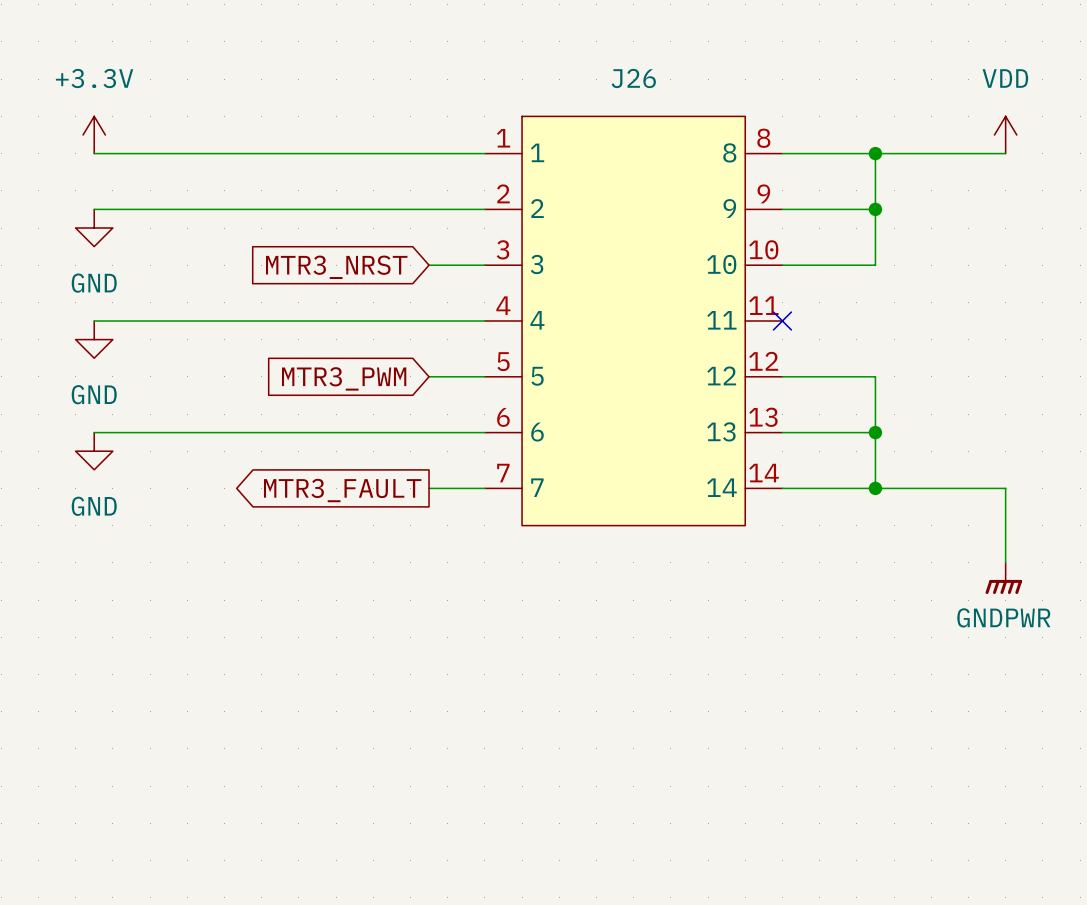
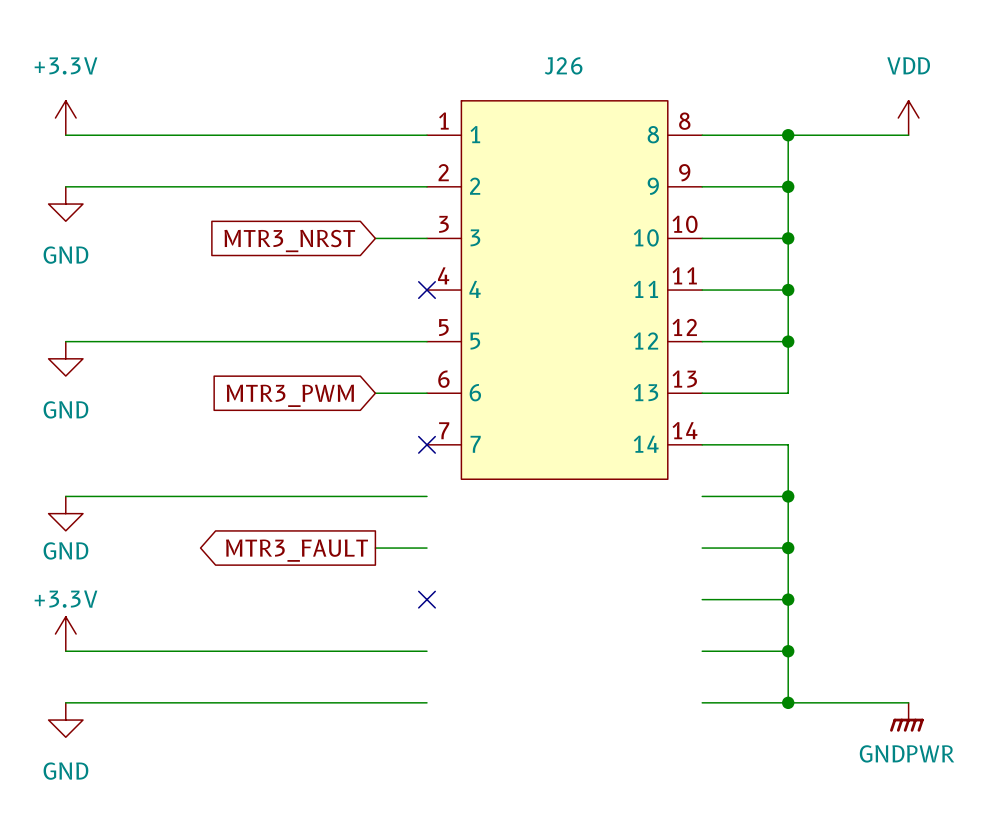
wire: none -> (788, 238) (788, 341)
junction: none -> (788, 238)
wire: (94, 321) (484, 321) -> (65, 496) (426, 496)
no-connect mark: none -> (426, 290)
wire: none -> (702, 290) (788, 290)
no-connect mark: (782, 321) -> none
junction: none -> (788, 290)
power symbol: GND (94, 339) -> none
junction: none -> (788, 341)
global label position: MTR3_PWM (344, 378) -> MTR3_PWM (290, 395)
power symbol: none -> GND (65, 358)
wire: (94, 432) (429, 432) -> (65, 341) (375, 341)
wire: (875, 432) (875, 488) (1005, 488) (1005, 562) -> none
junction: (875, 432) -> none
power symbol: GND (94, 451) -> none
wire: (429, 488) (484, 488) -> (375, 548) (426, 548)
no-connect mark: none -> (426, 444)
wire: none -> (788, 444) (788, 702)
junction: (875, 488) -> none
global label position: MTR3_FAULT (342, 490) -> MTR3_FAULT (297, 550)
wire: none -> (702, 496) (788, 496)
junction: none -> (788, 496)
power symbol: none -> GND (65, 513)
power symbol position: GNDPWR (1003, 578) -> GNDPWR (906, 717)
wire: none -> (702, 548) (788, 548)
junction: none -> (788, 548)
no-connect mark: none -> (426, 599)
wire: none -> (702, 599) (788, 599)
junction: none -> (788, 599)
power symbol: none -> +3.3V (65, 634)
wire: none -> (65, 651) (426, 651)
wire: none -> (702, 651) (788, 651)
junction: none -> (788, 651)
wire: none -> (65, 702) (426, 702)
wire: none -> (702, 702) (908, 702)
junction: none -> (788, 702)
power symbol: none -> GND (65, 720)

